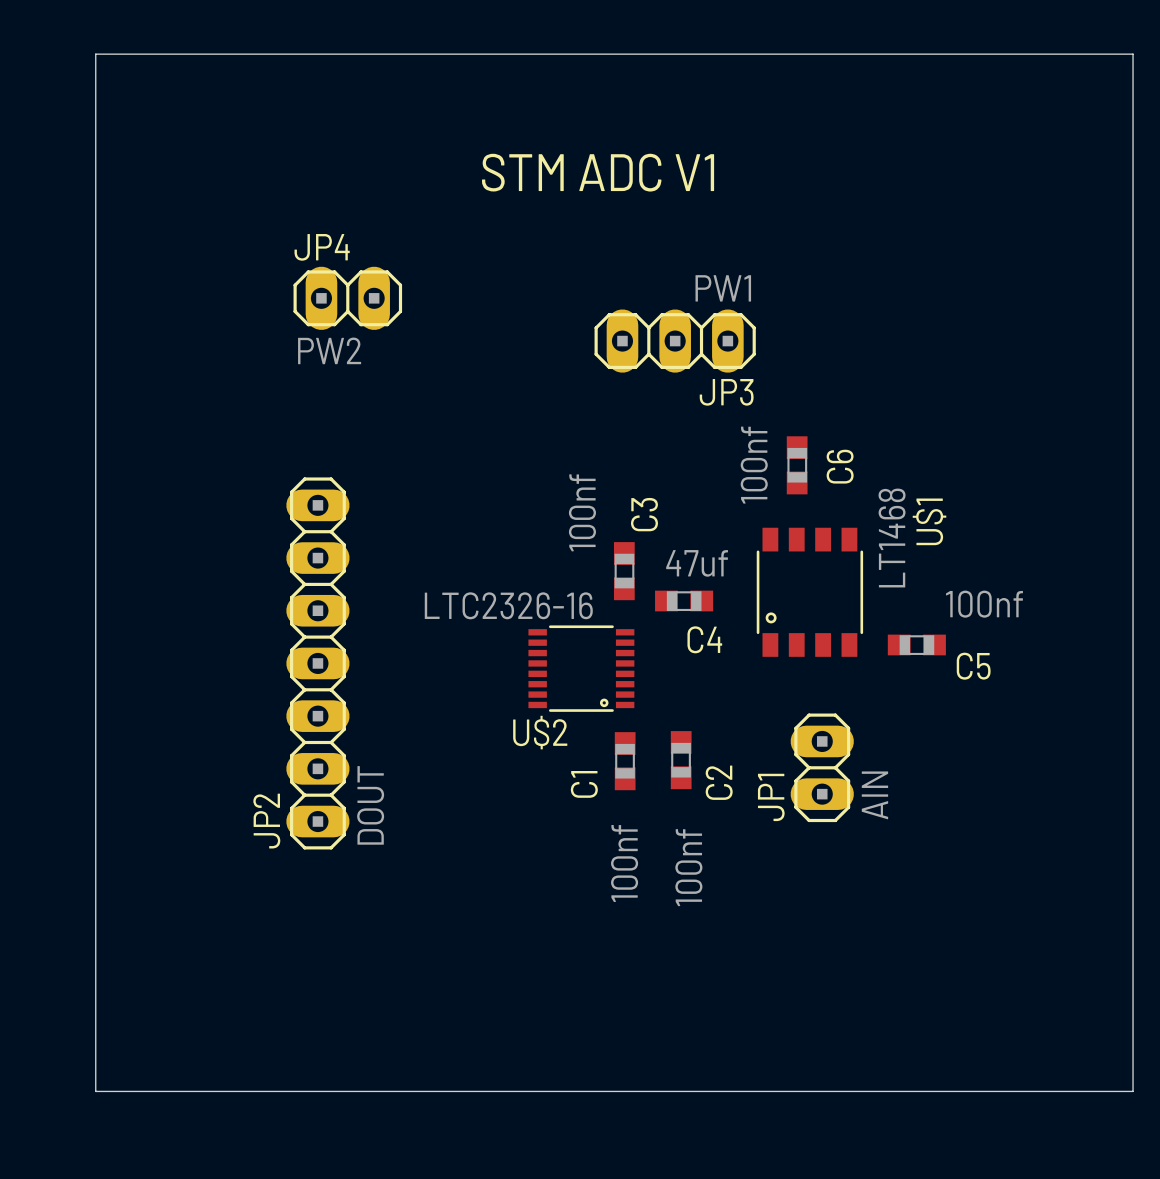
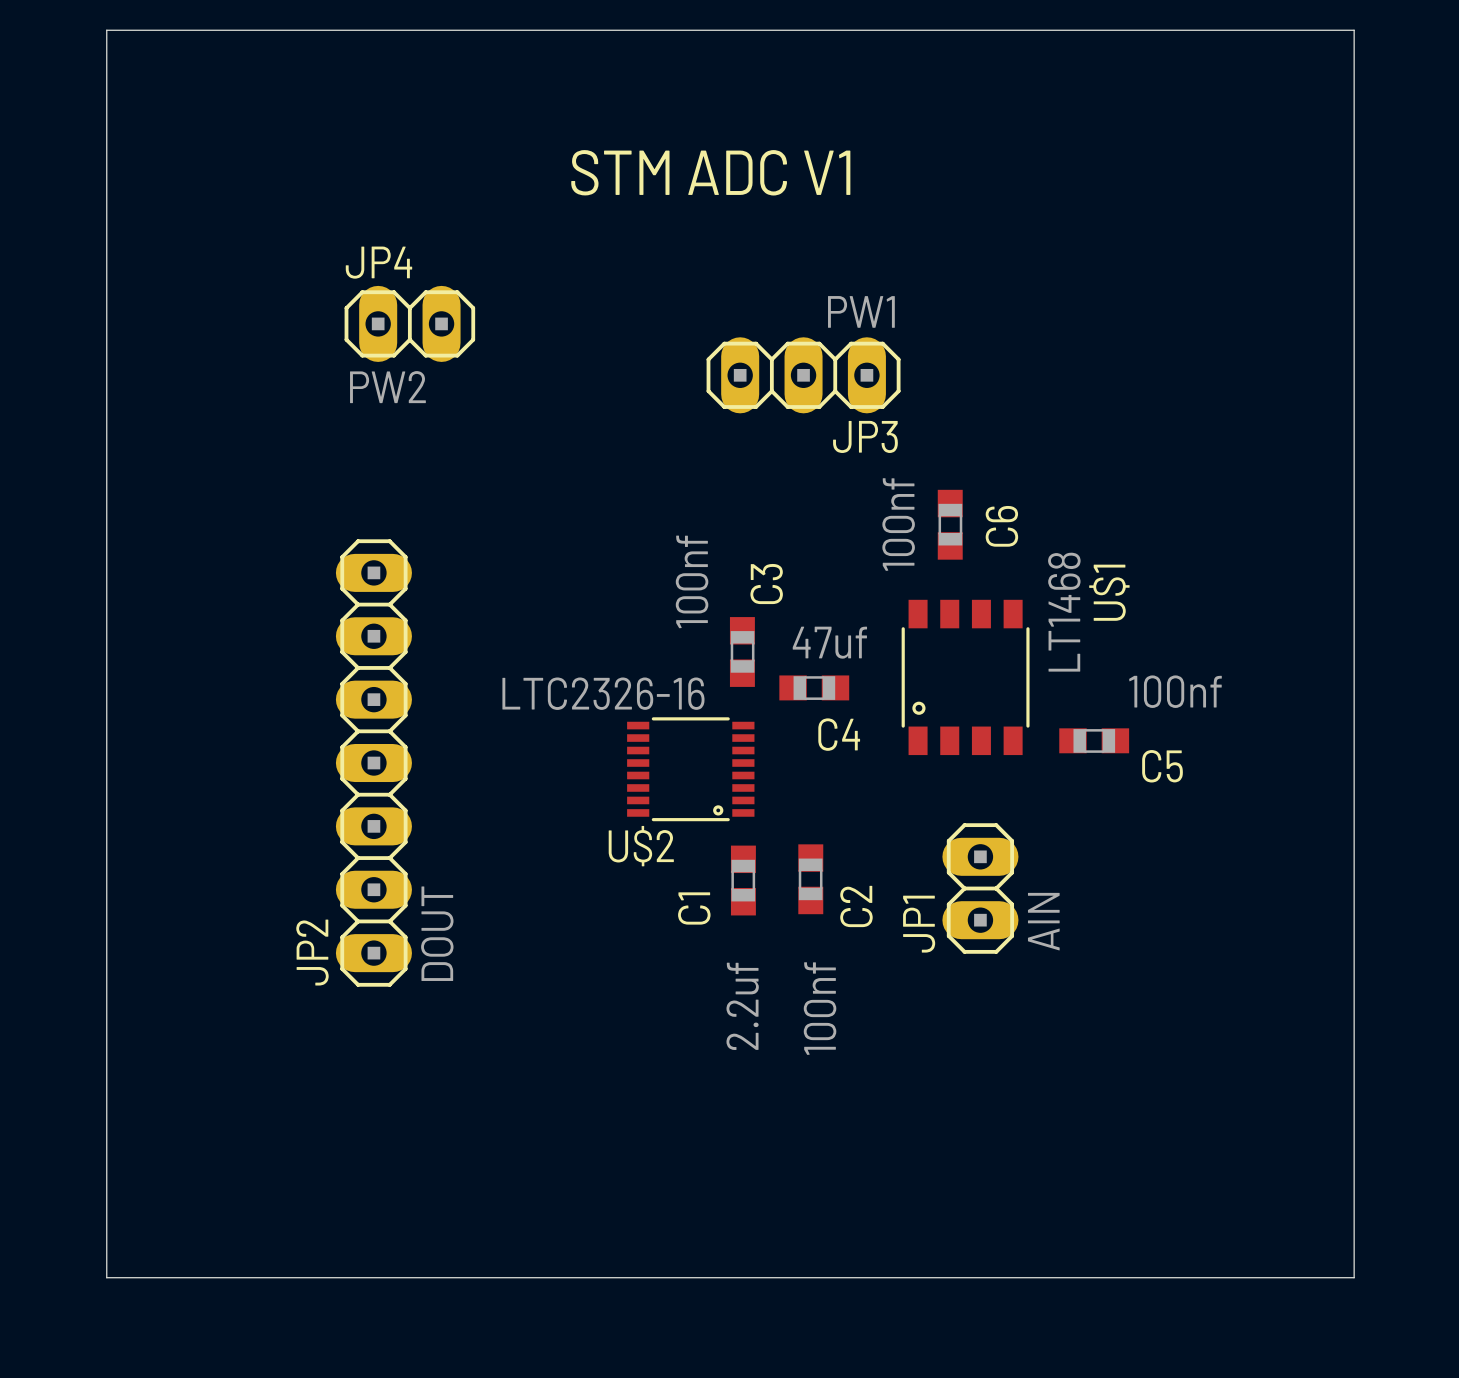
C1 value: 100nf (624, 863) -> 2.2uf (742, 1006)

